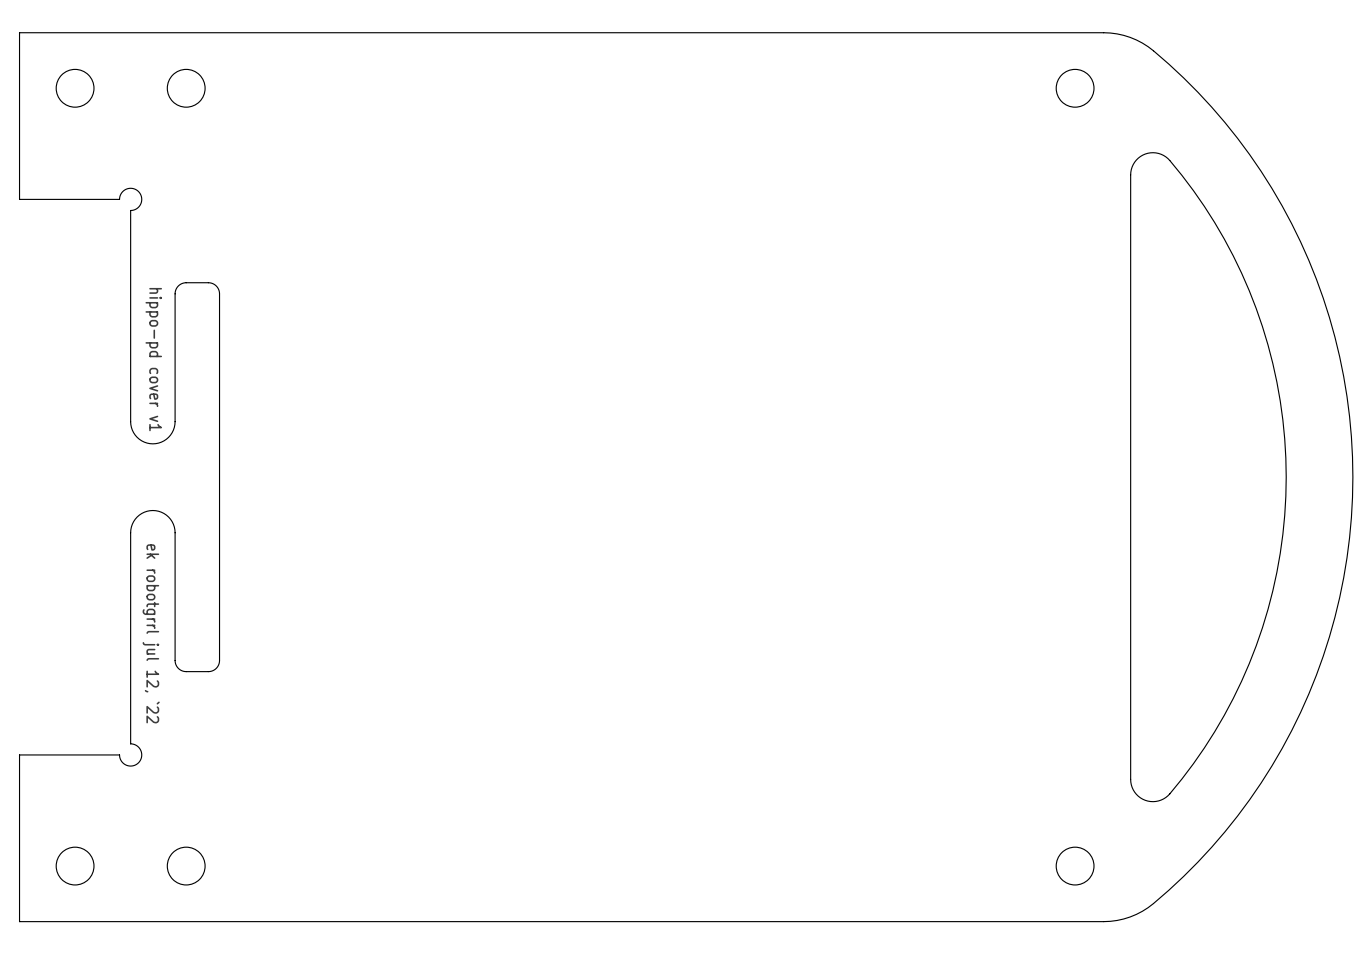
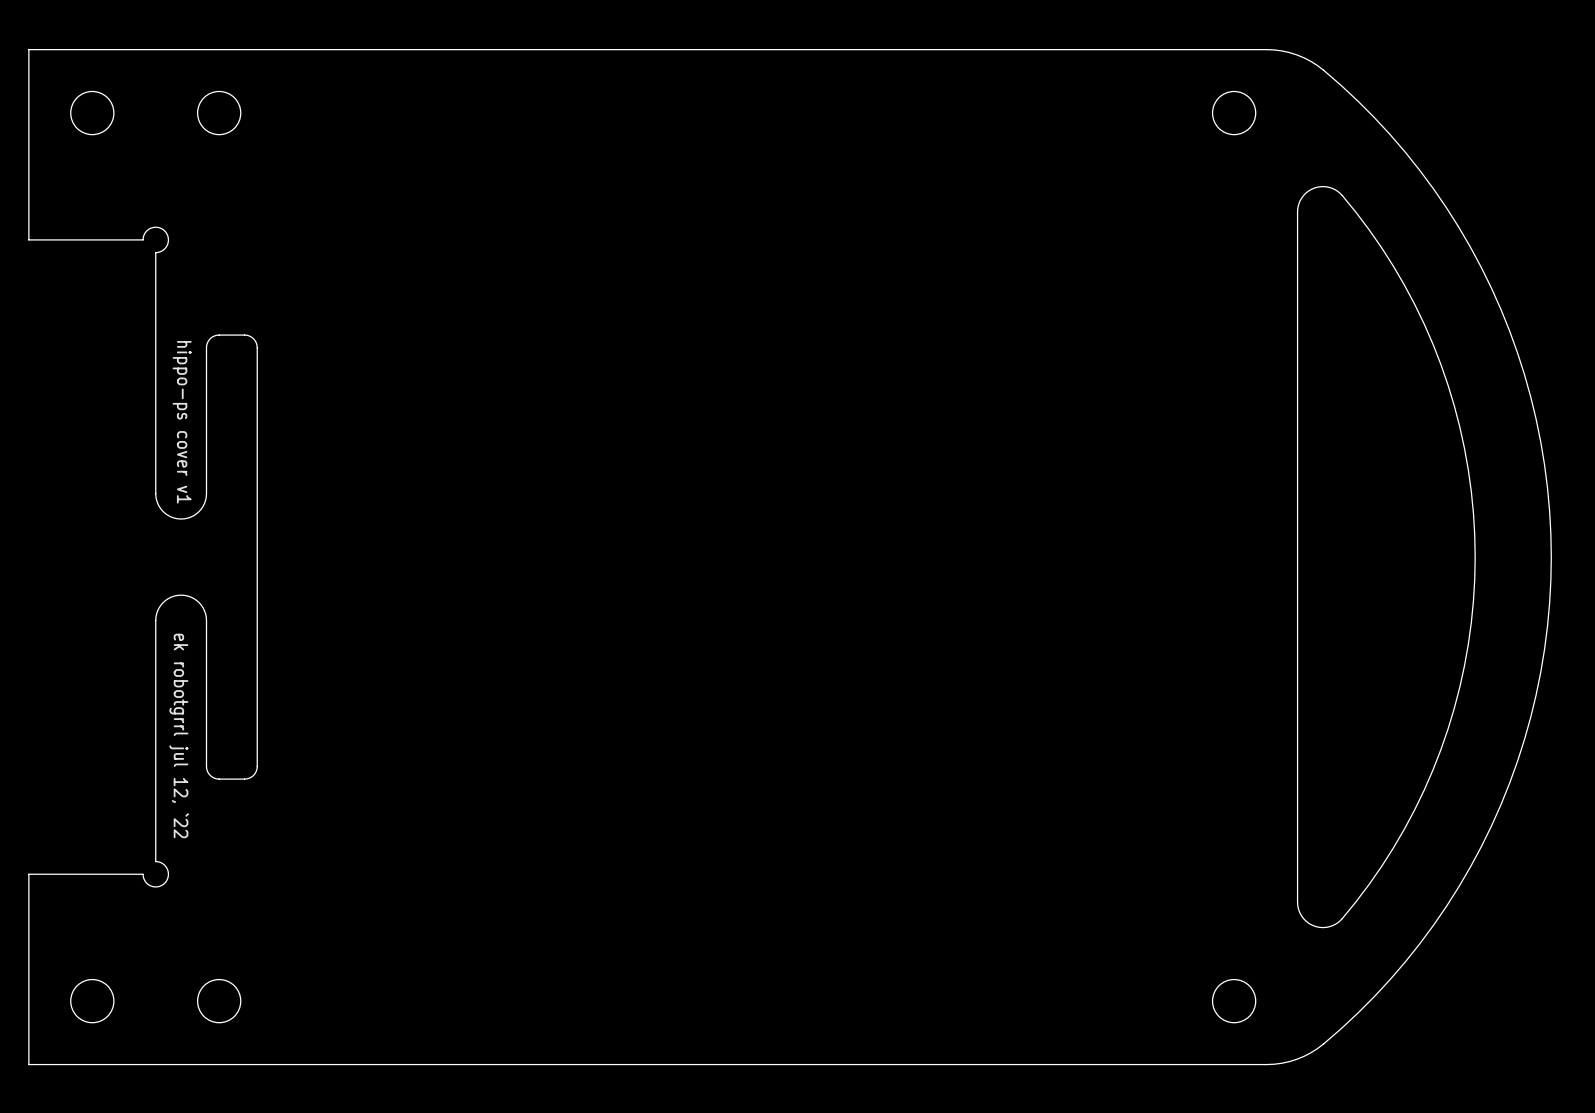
text: hippo-pd cover v1 (153, 359) -> hippo-ps cover v1 (182, 422)

